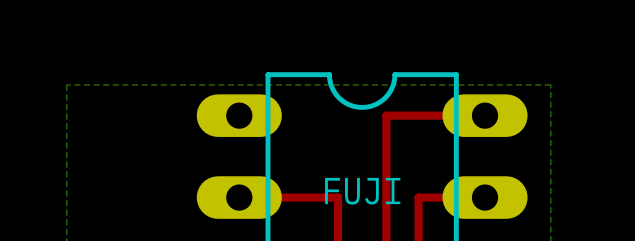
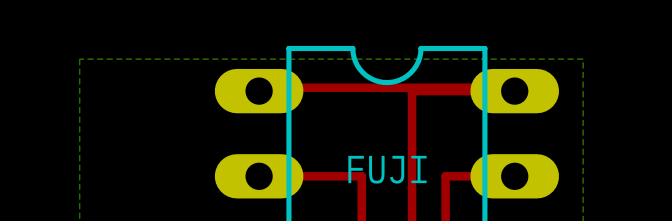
top track: none -> (514, 87) (259, 87)

